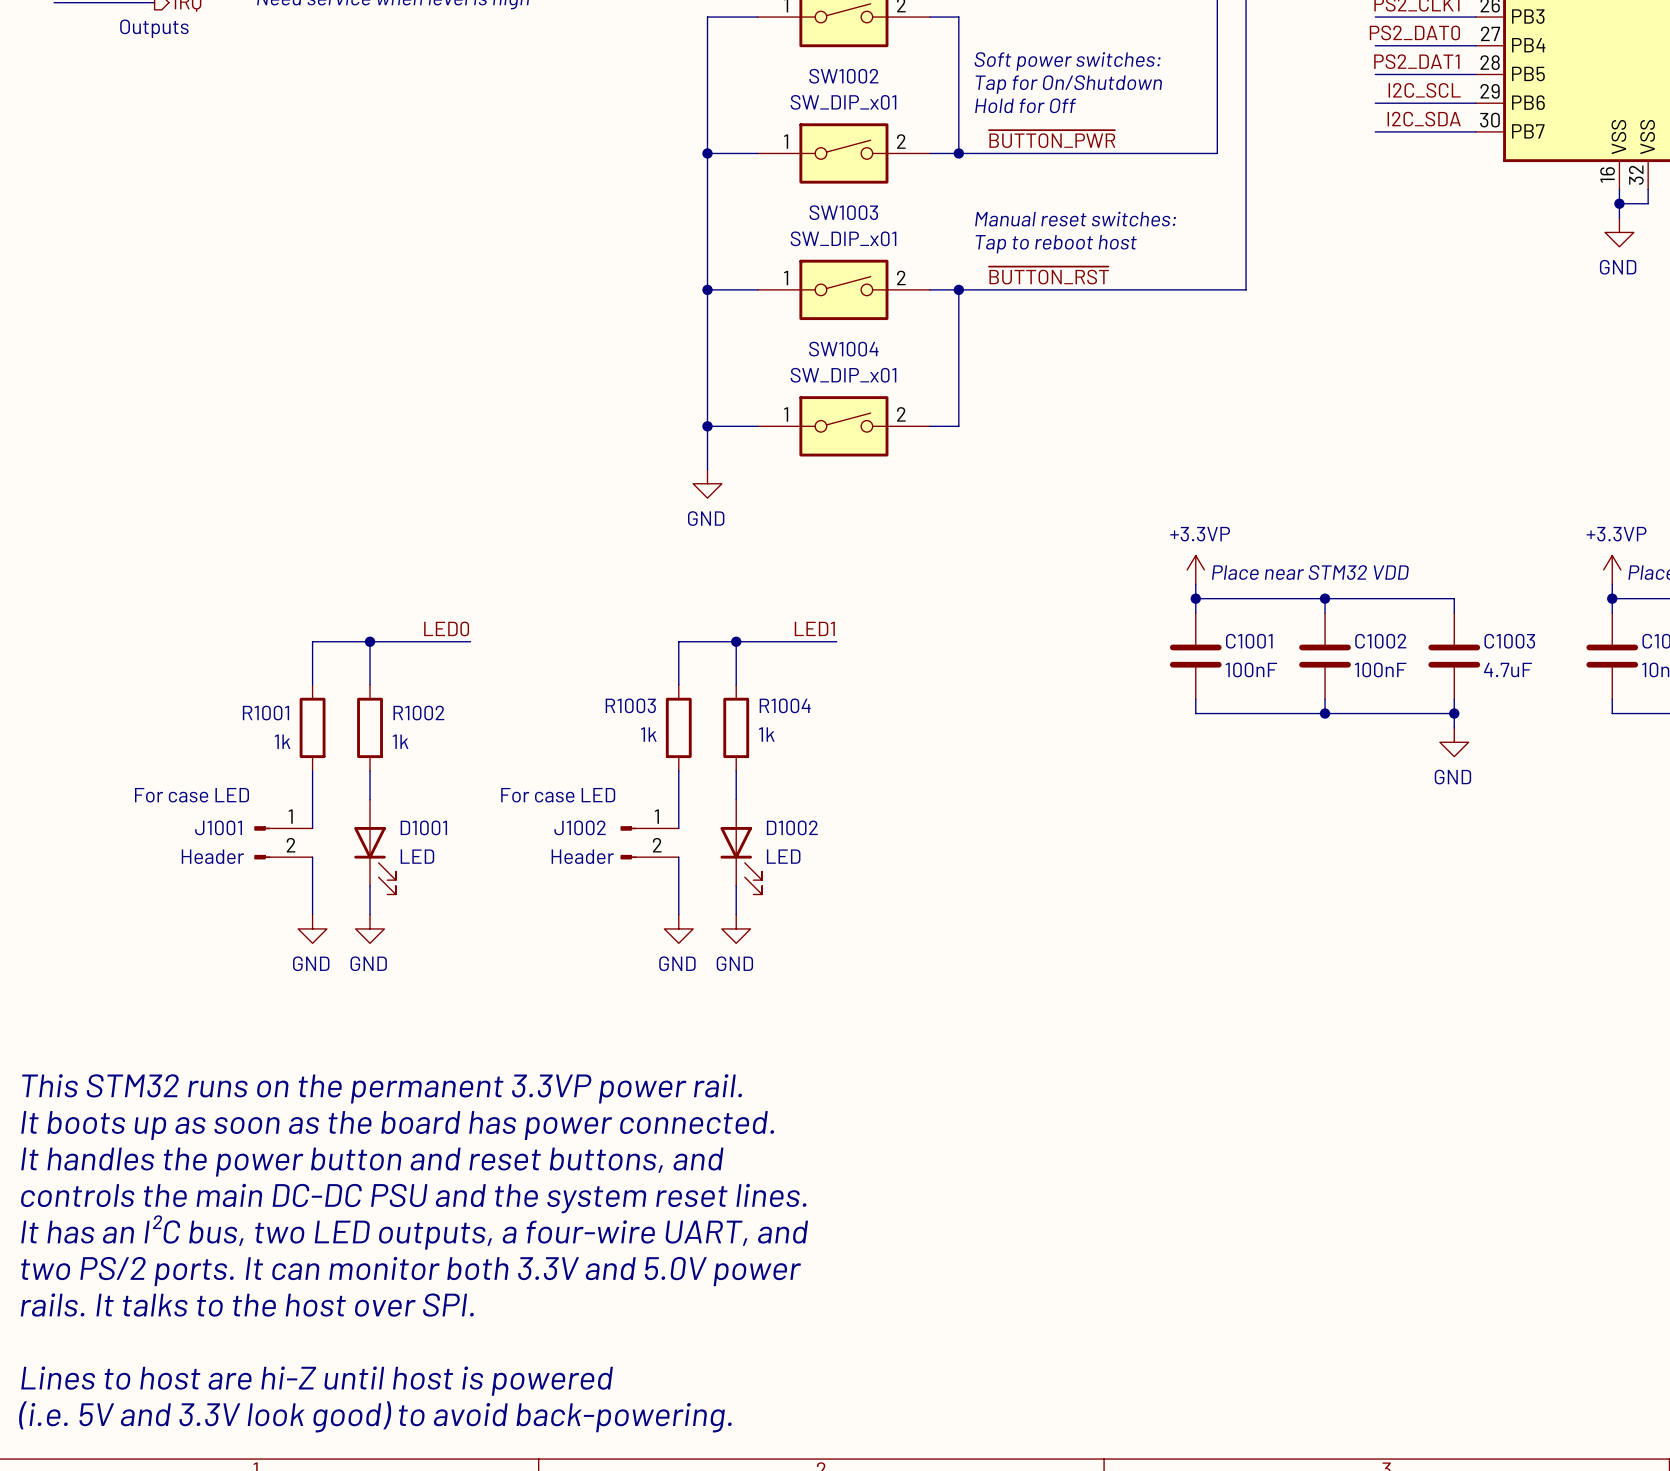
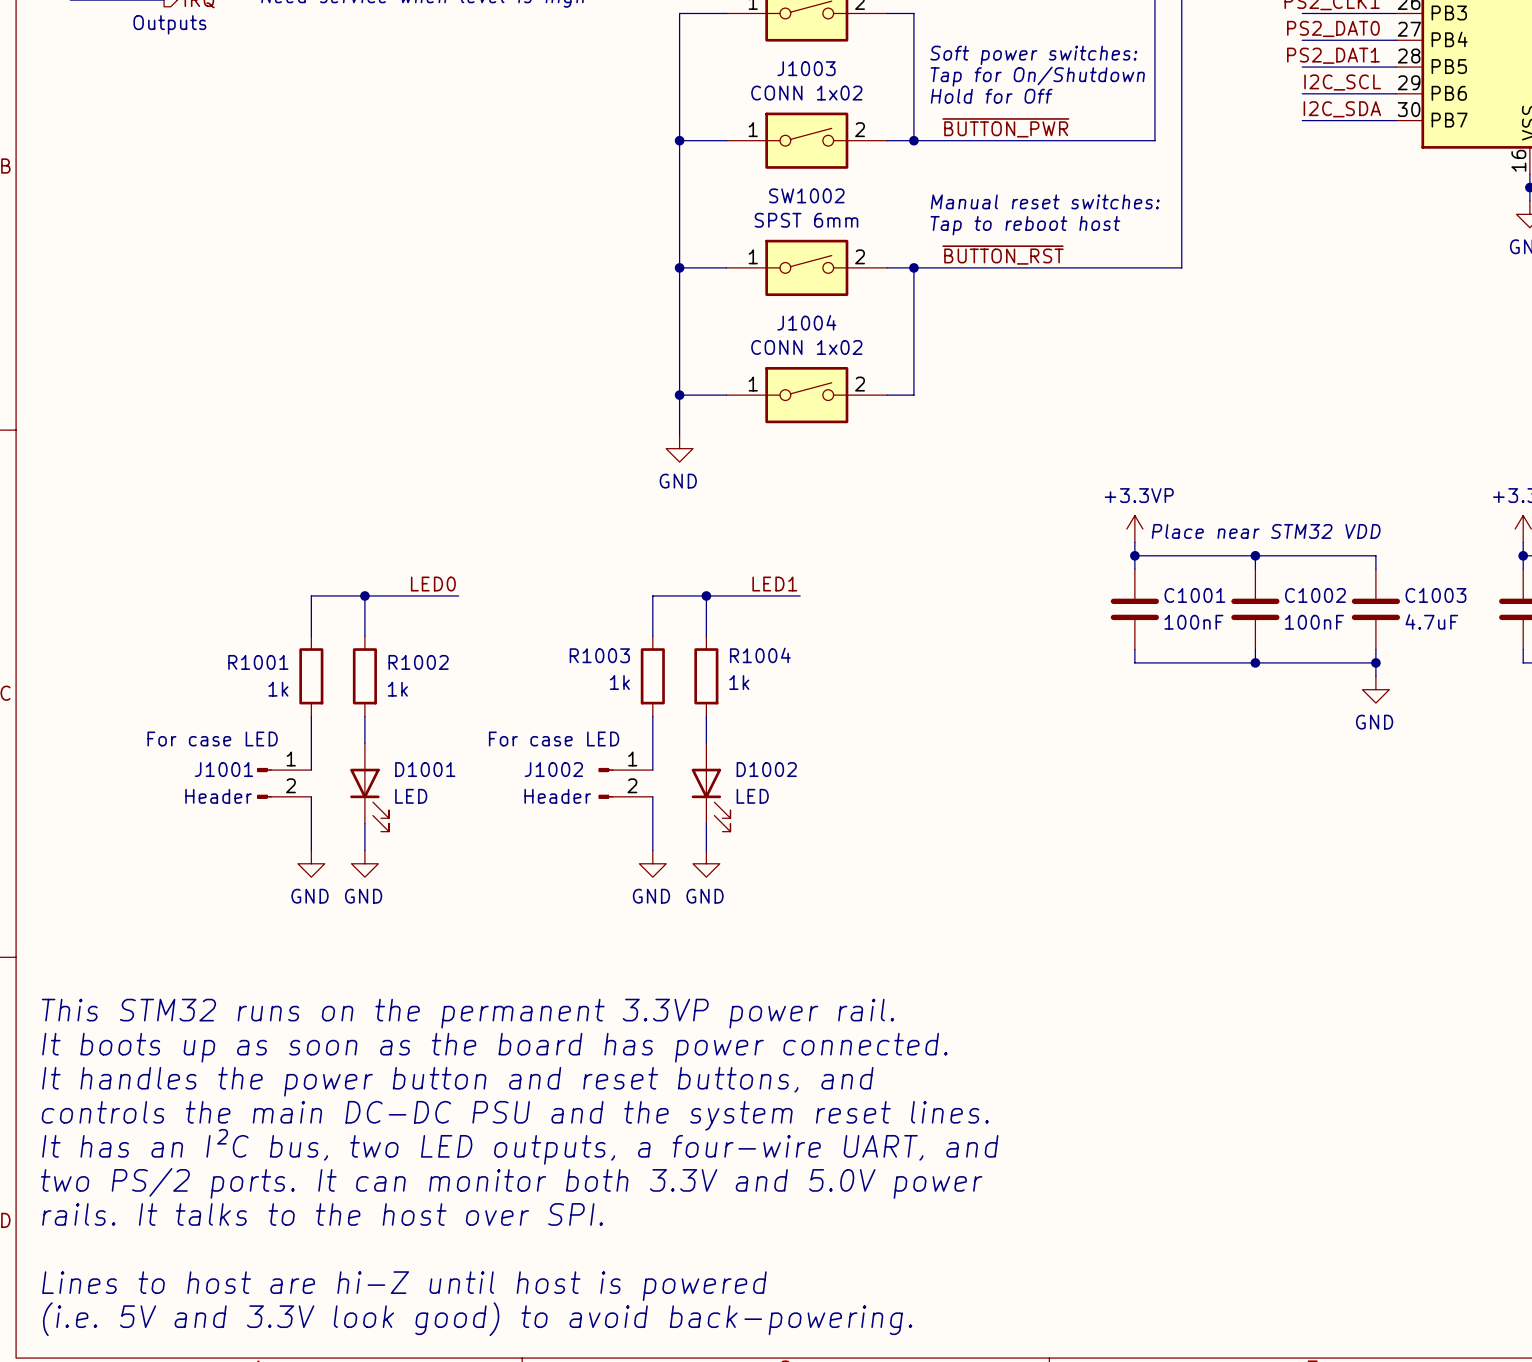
SW1002 name: SW1002 (843, 76) -> J1003 (806, 68)
SW1002 value: SW_DIP_x01 (843, 102) -> CONN 1x02 (806, 93)
SW1003 name: SW1003 (843, 212) -> SW1002 (806, 195)
SW1003 value: SW_DIP_x01 (843, 238) -> SPST 6mm (806, 220)
SW1004 name: SW1004 (843, 349) -> J1004 (806, 322)
SW1004 value: SW_DIP_x01 (843, 375) -> CONN 1x02 (806, 347)

